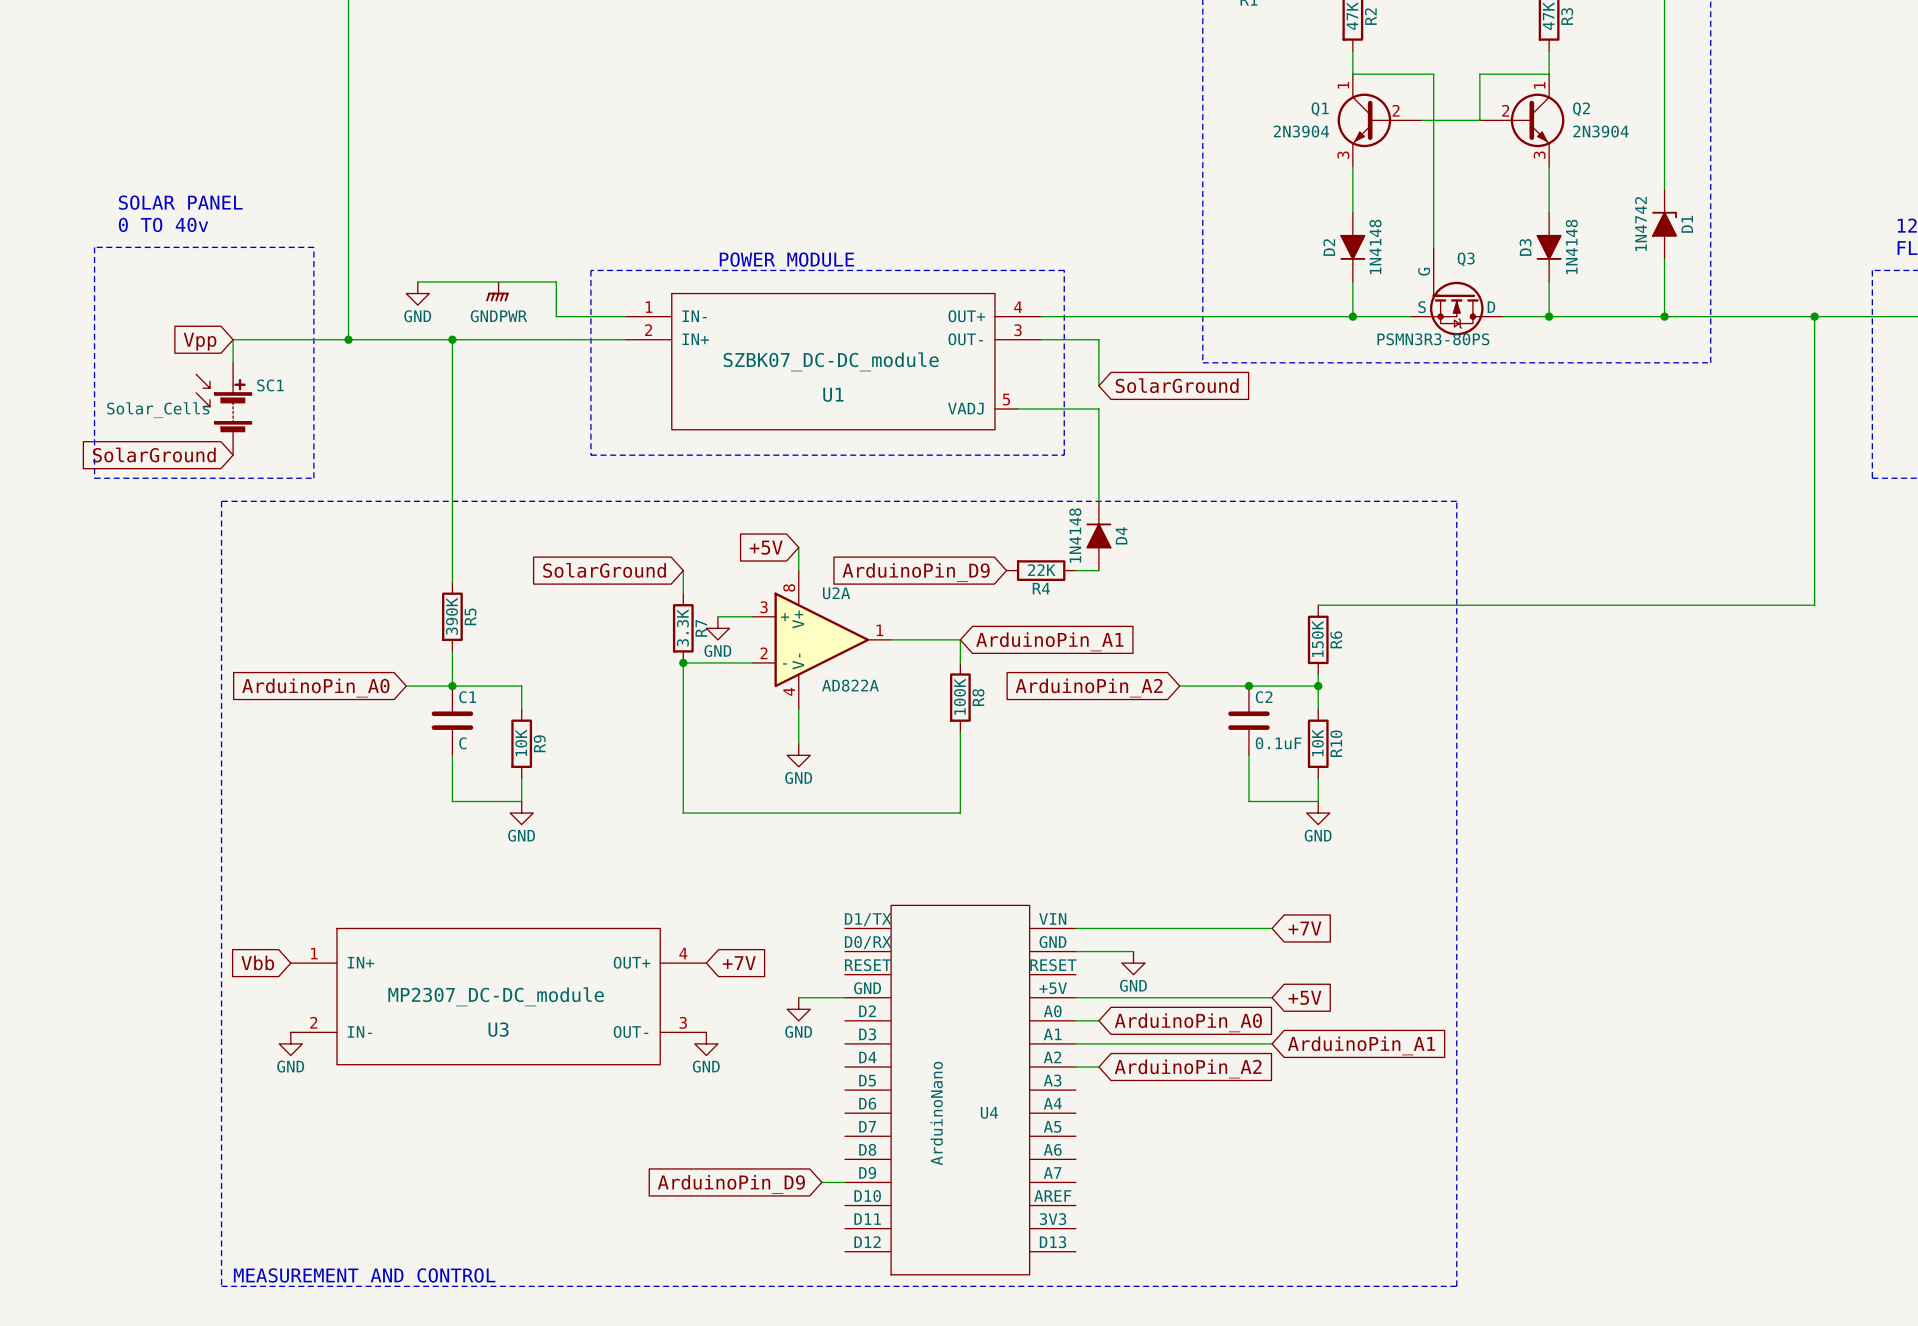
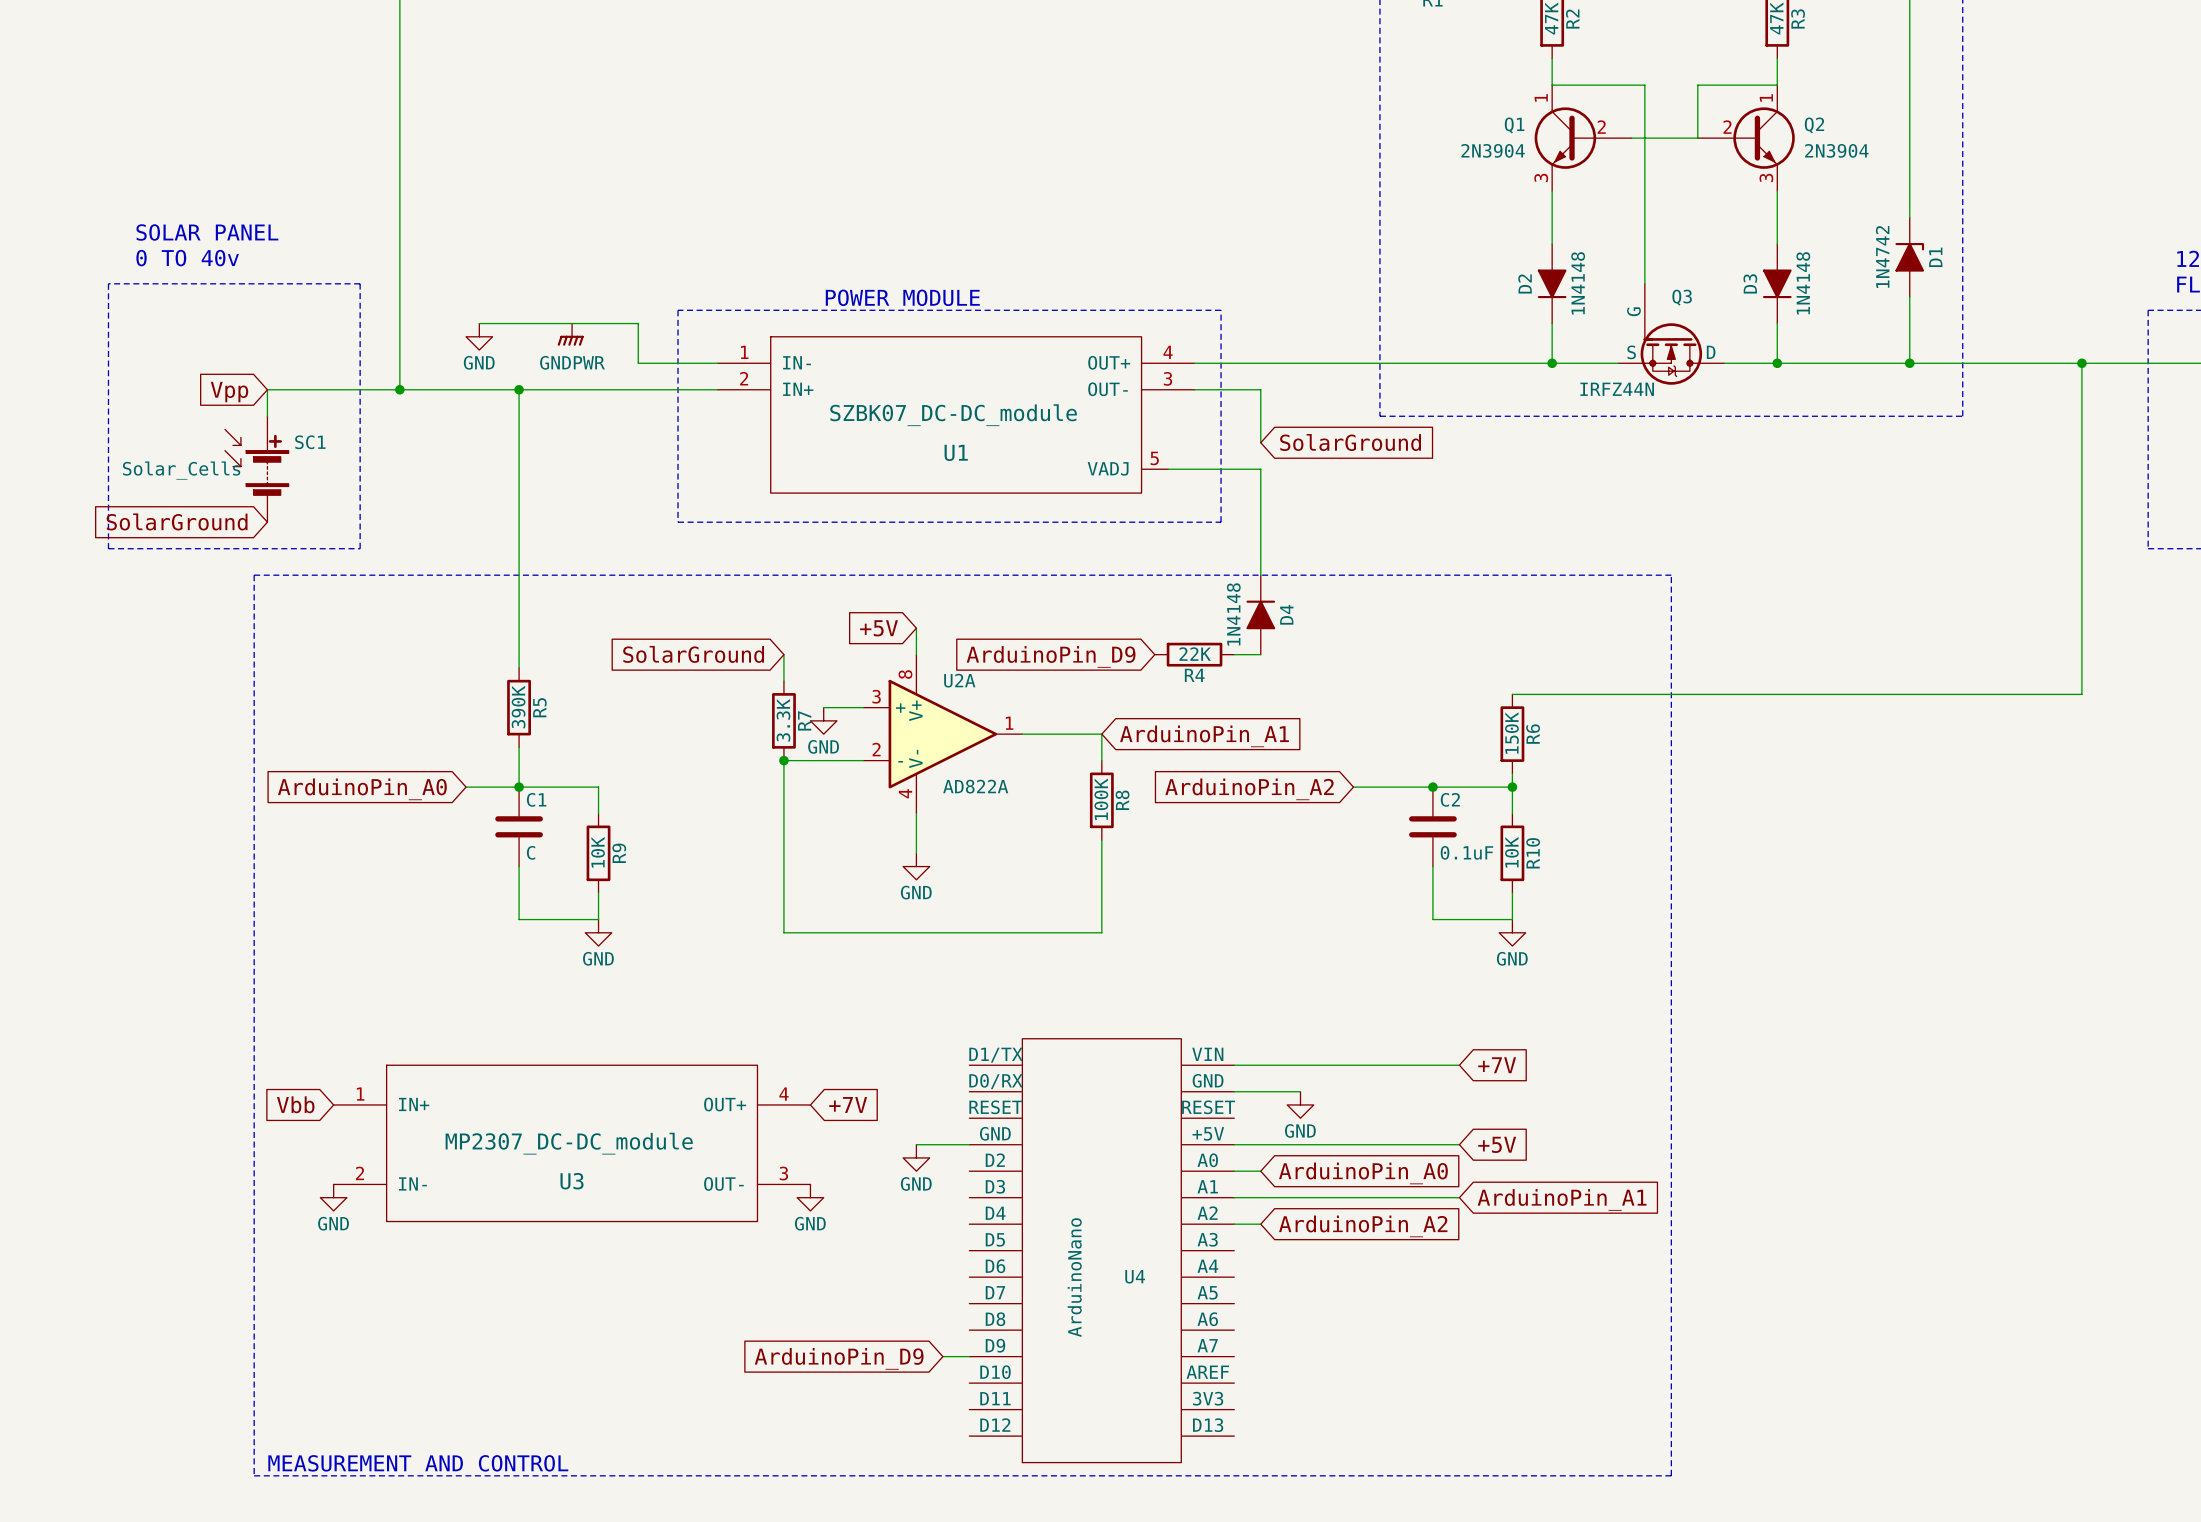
Q3 value: PSMN3R3-80PS (1433, 339) -> IRFZ44N (1617, 389)

